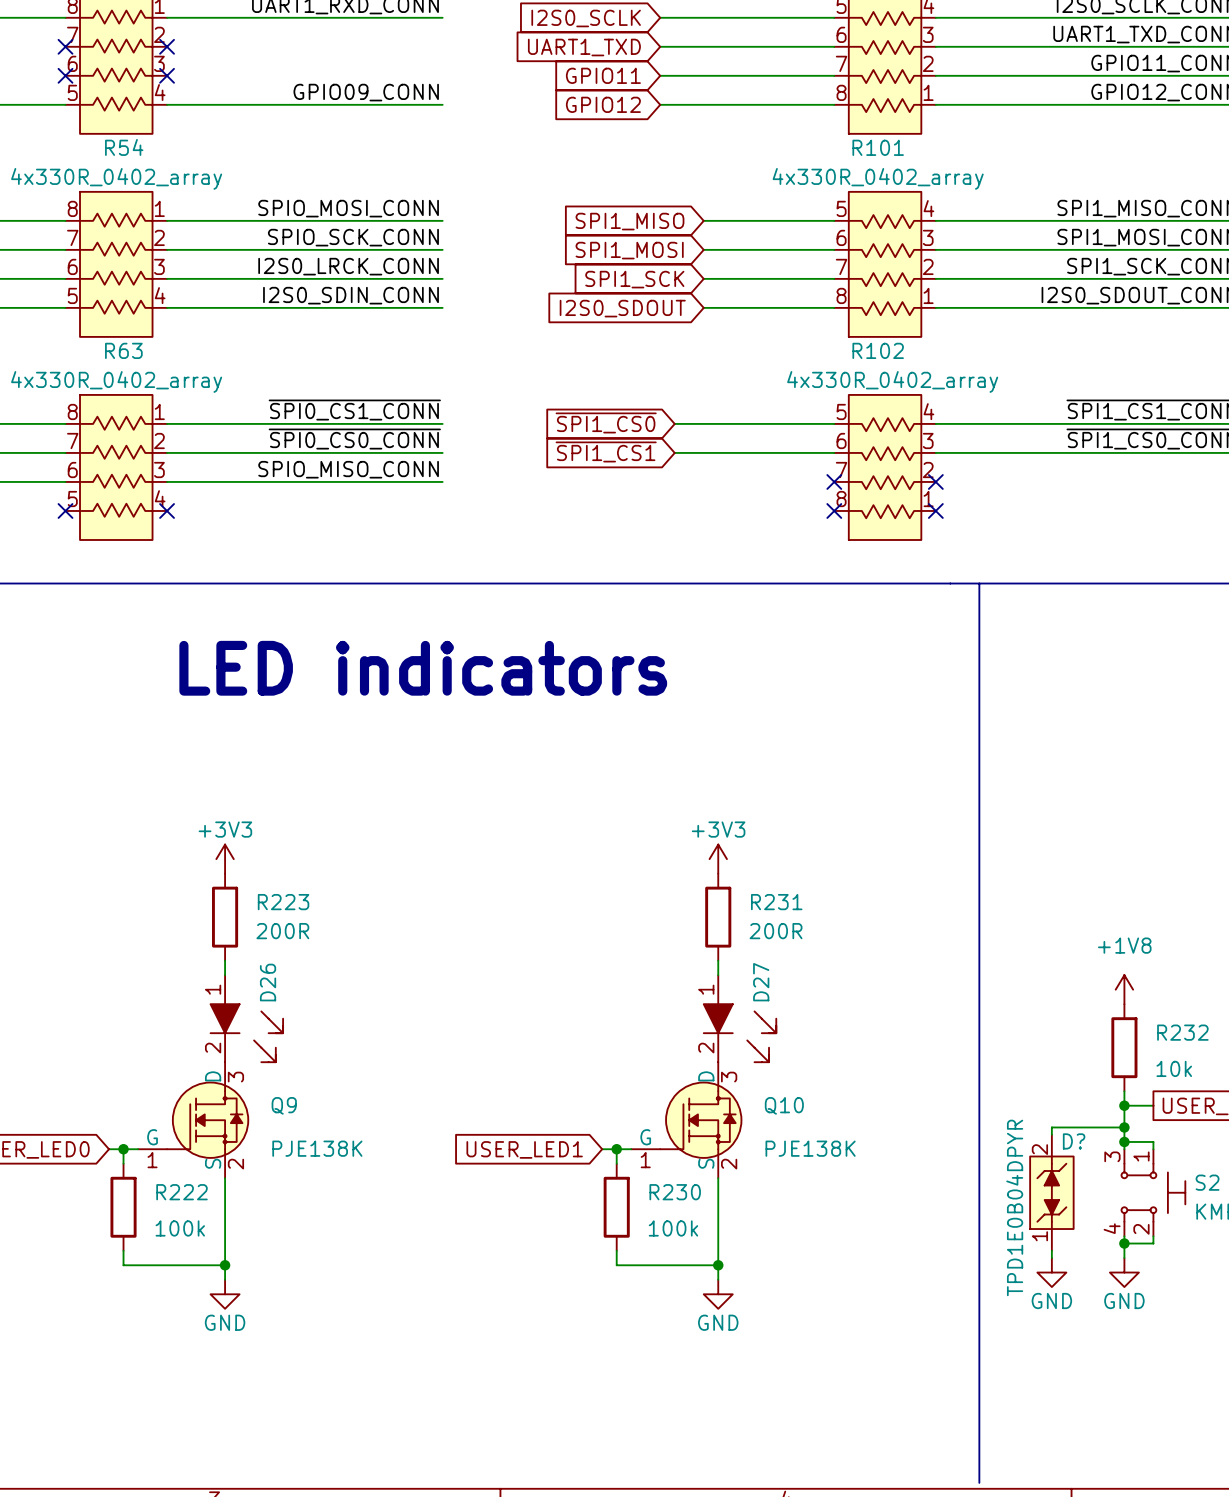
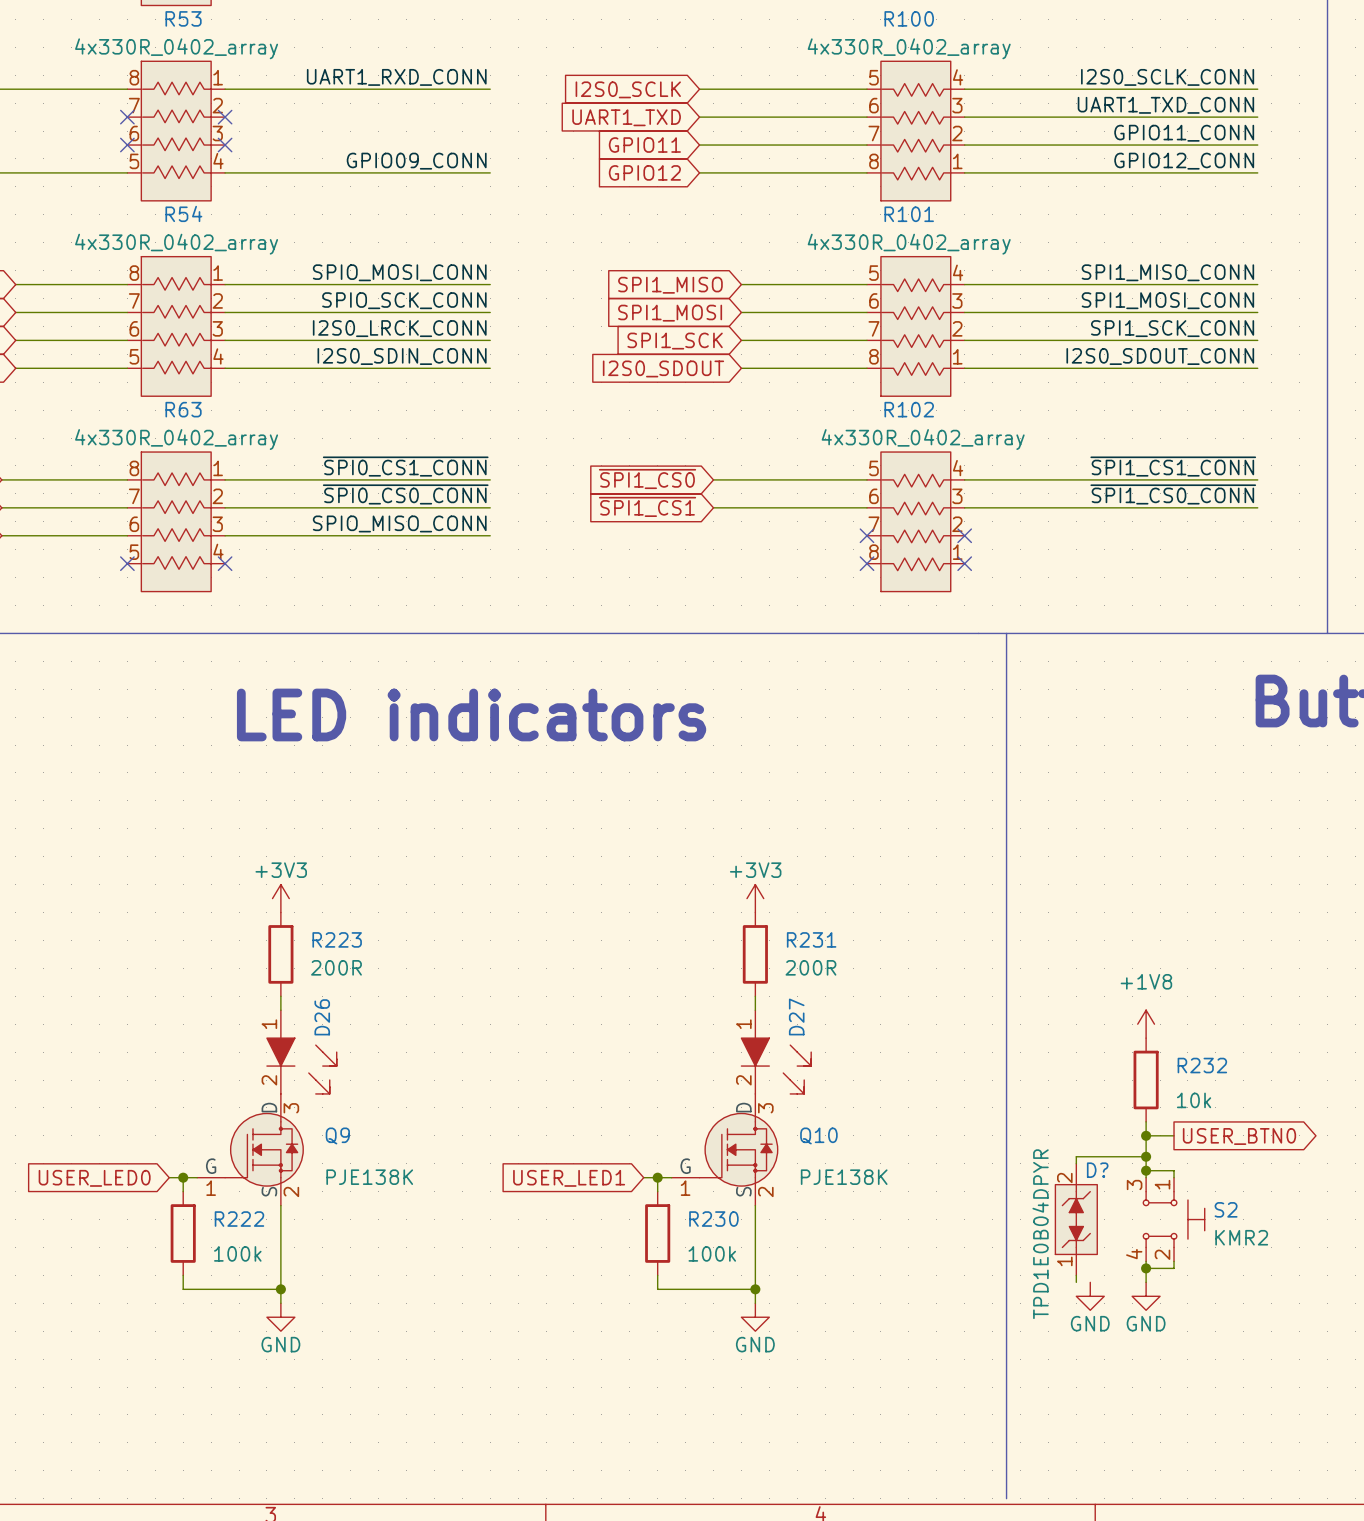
power symbol position: GND (1051, 1272) -> GND (1090, 1296)

